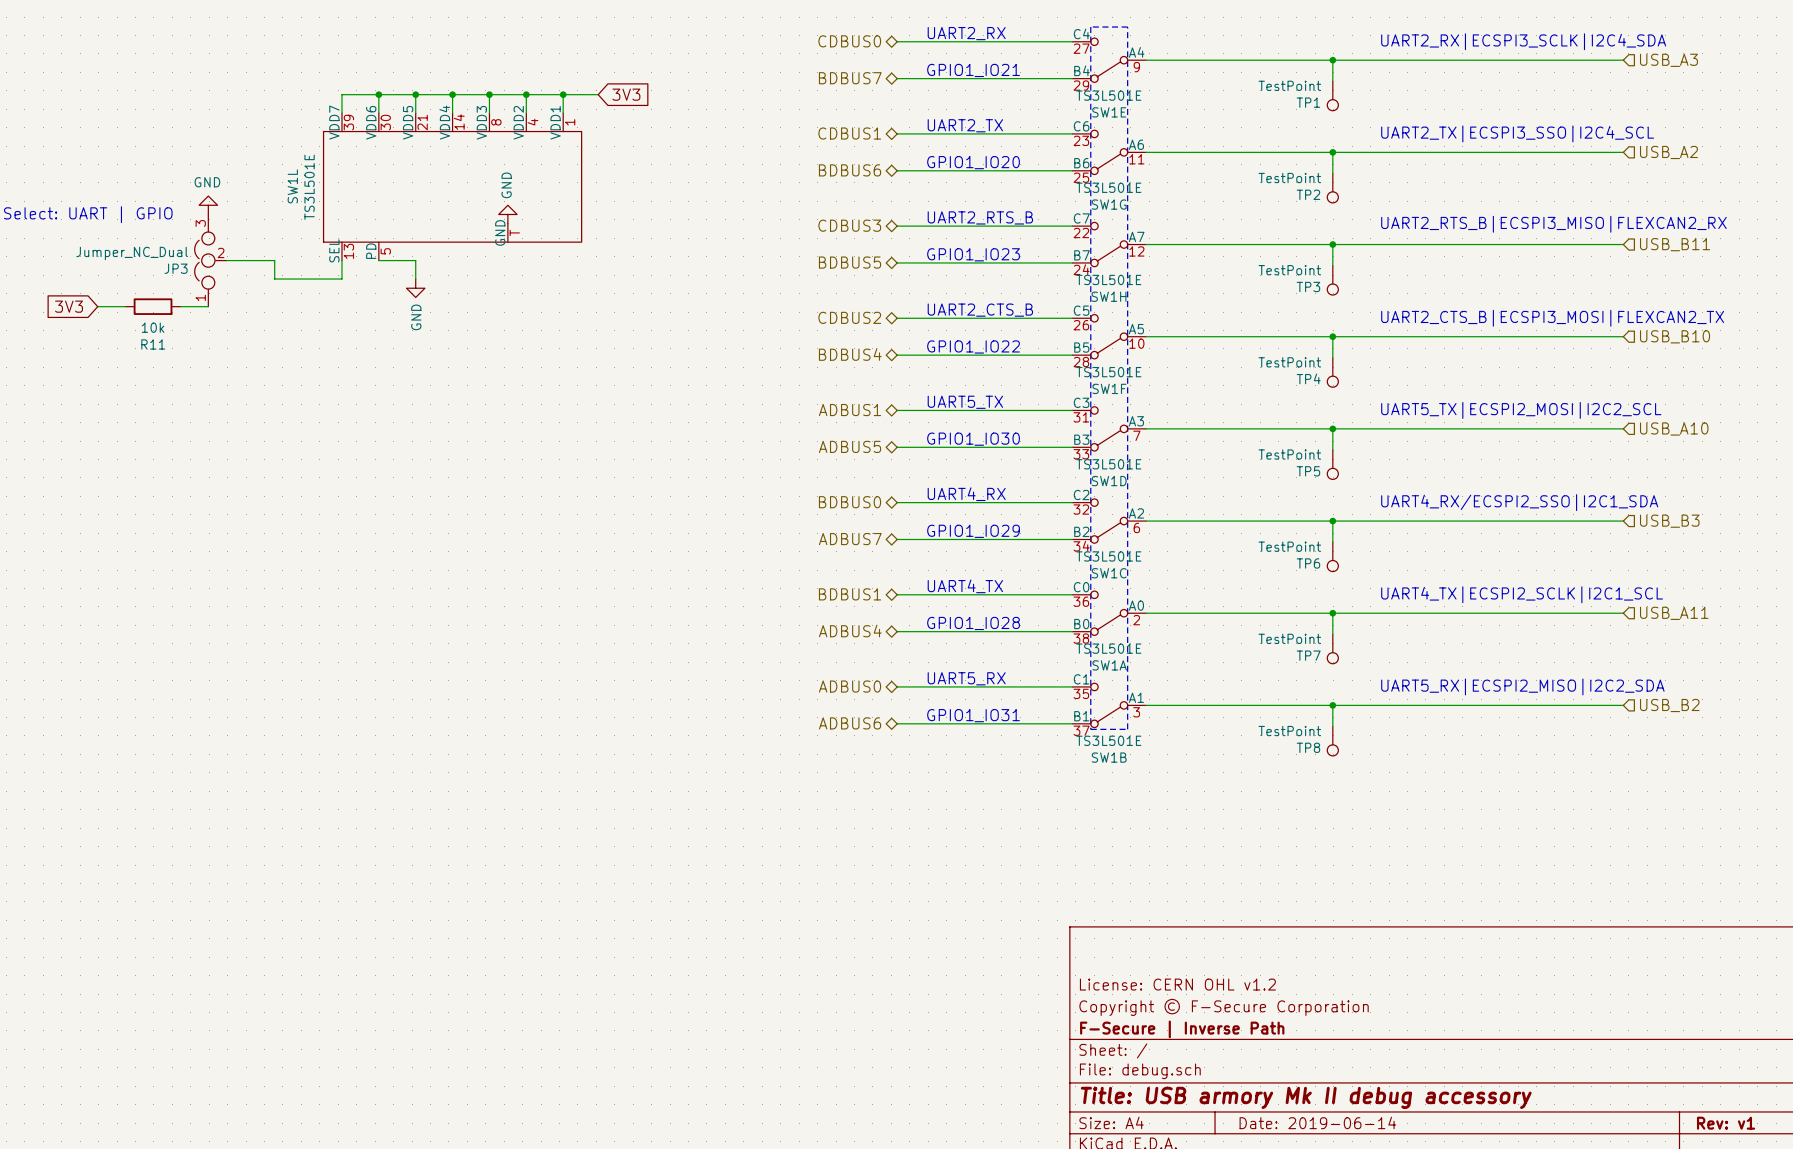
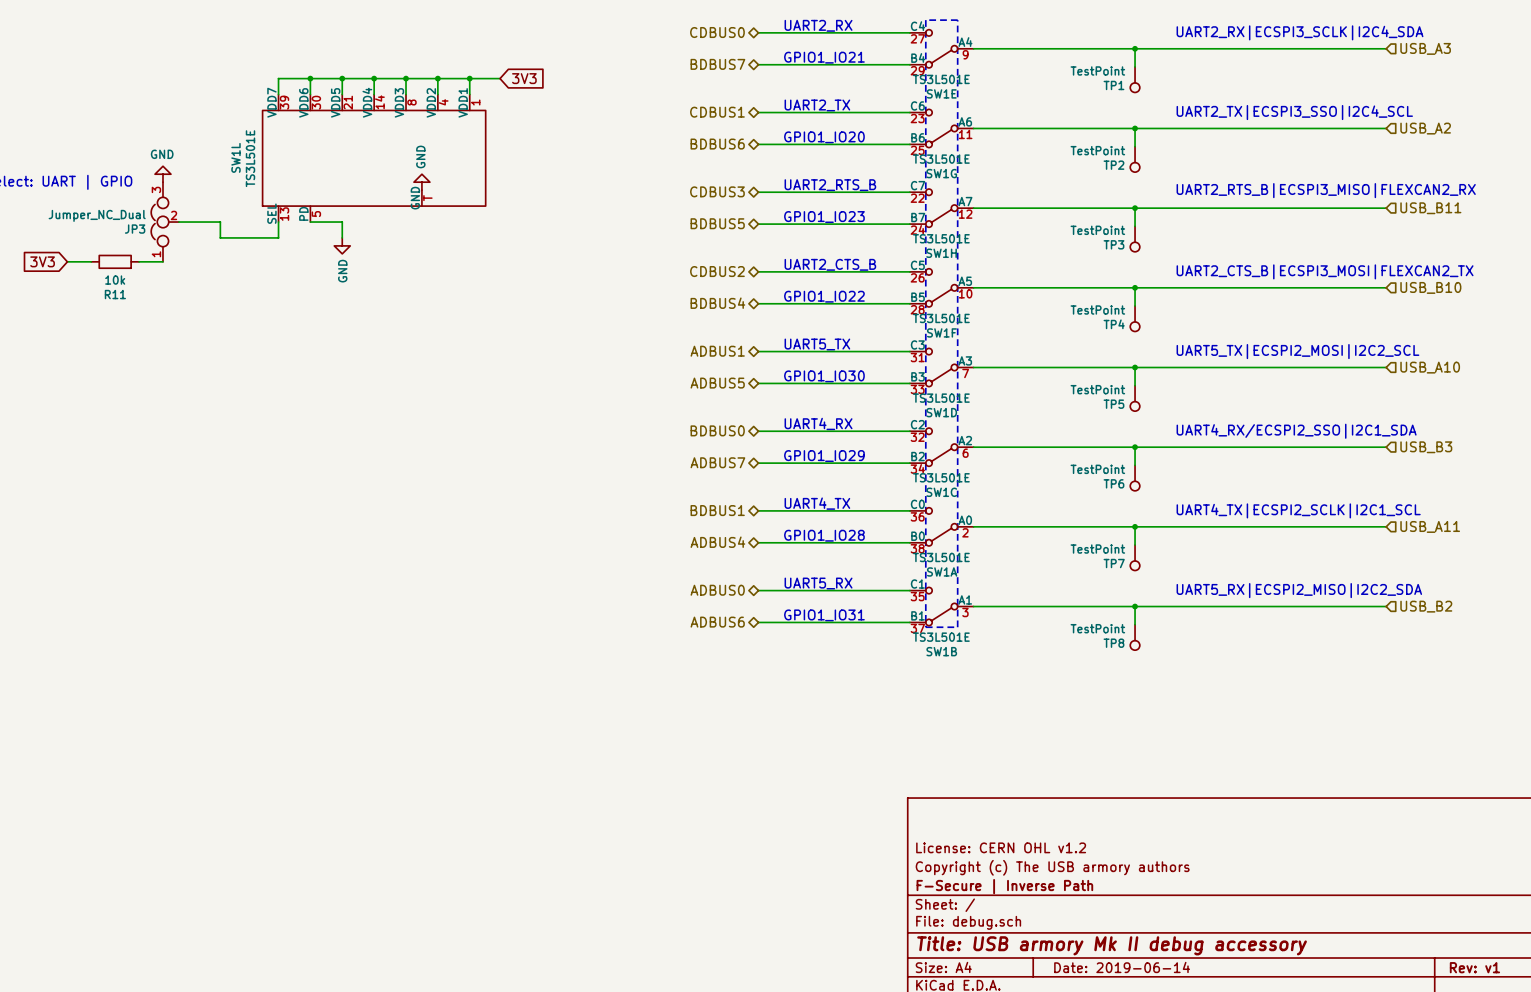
title block: Copyright © F-Secure Corporation (1224, 1007) -> Copyright (c) The USB armory authors (1052, 867)

